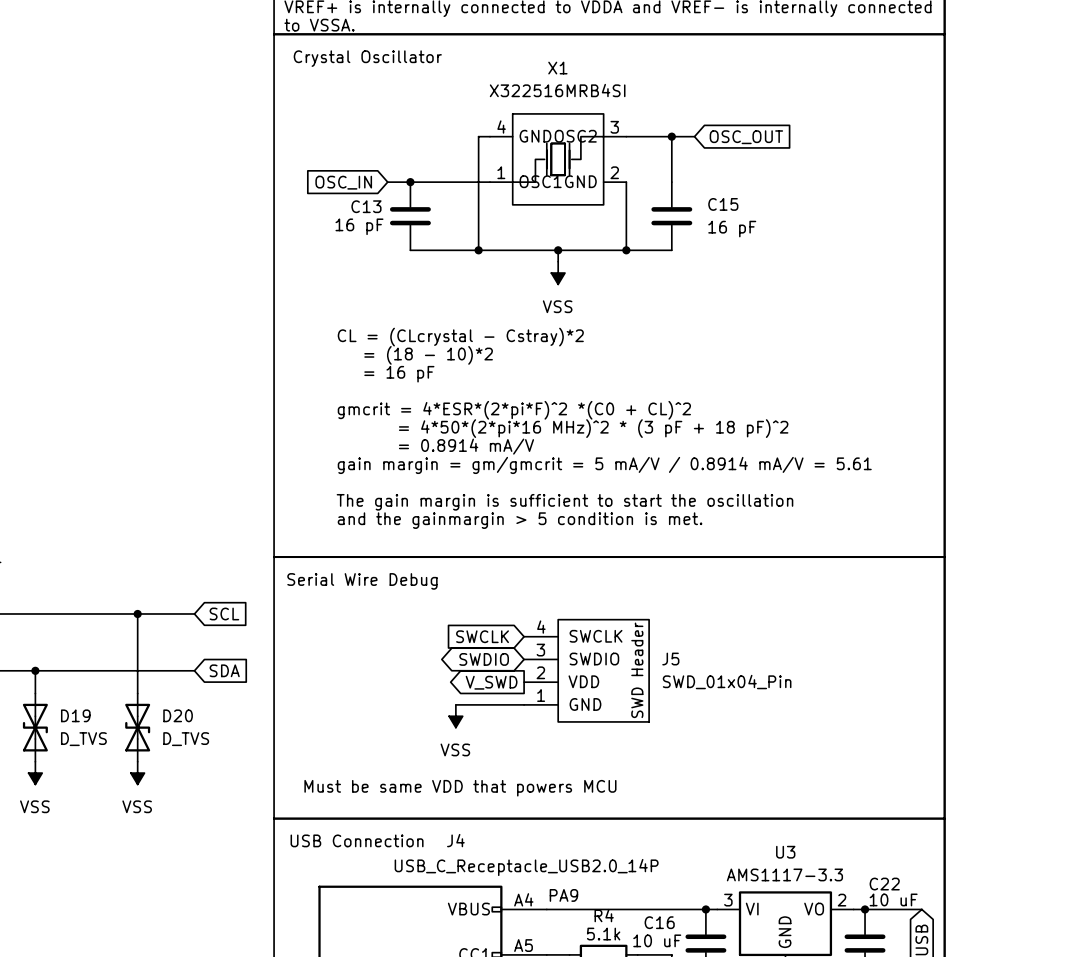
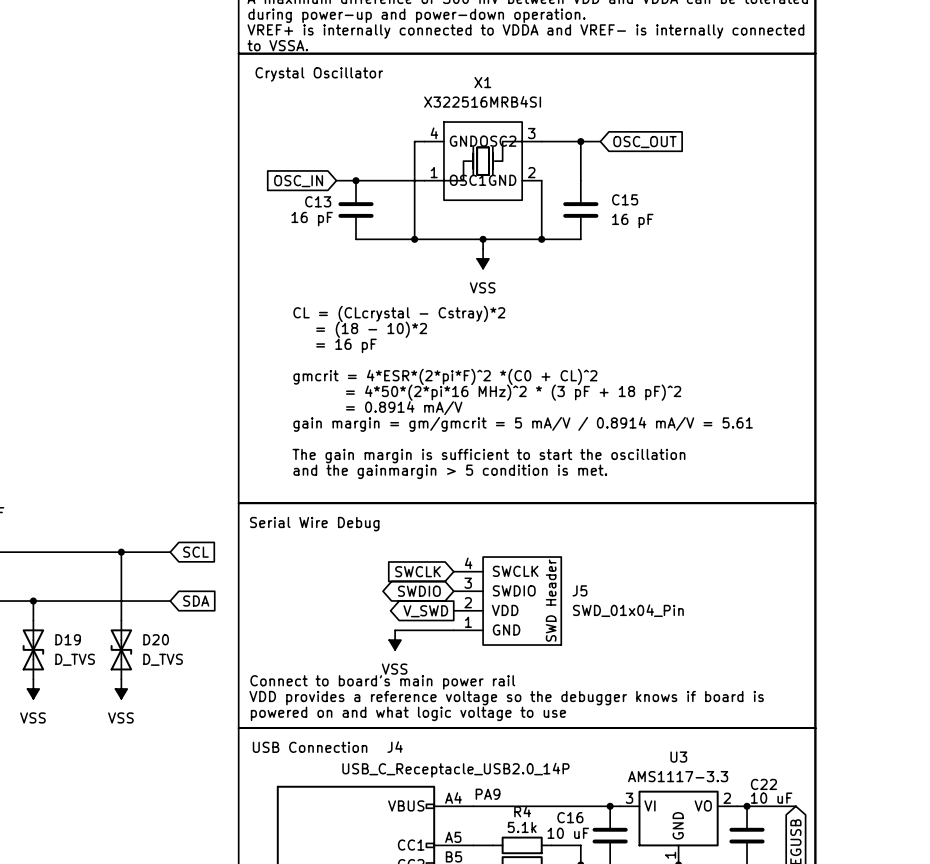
text: none -> Connect to board's main power rail (382, 682)
text: none -> VDD provides a reference voltage so the debugger knows if board is (506, 698)
text: Must be same VDD that powers MCU (460, 788) -> none
text: none -> powered on and what logic voltage to use (408, 713)

